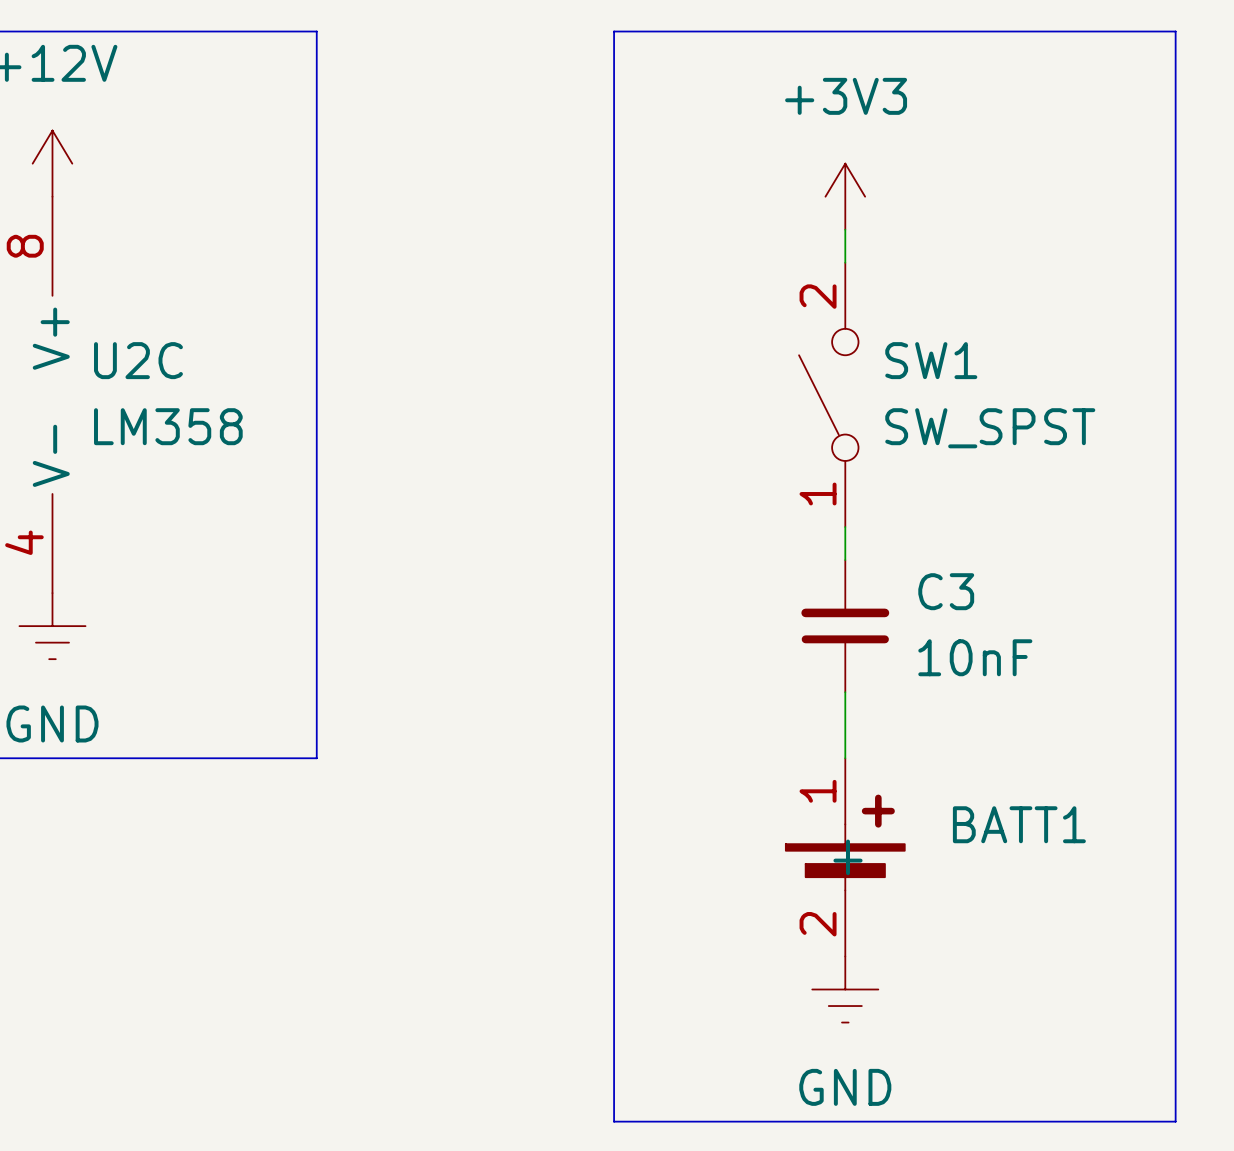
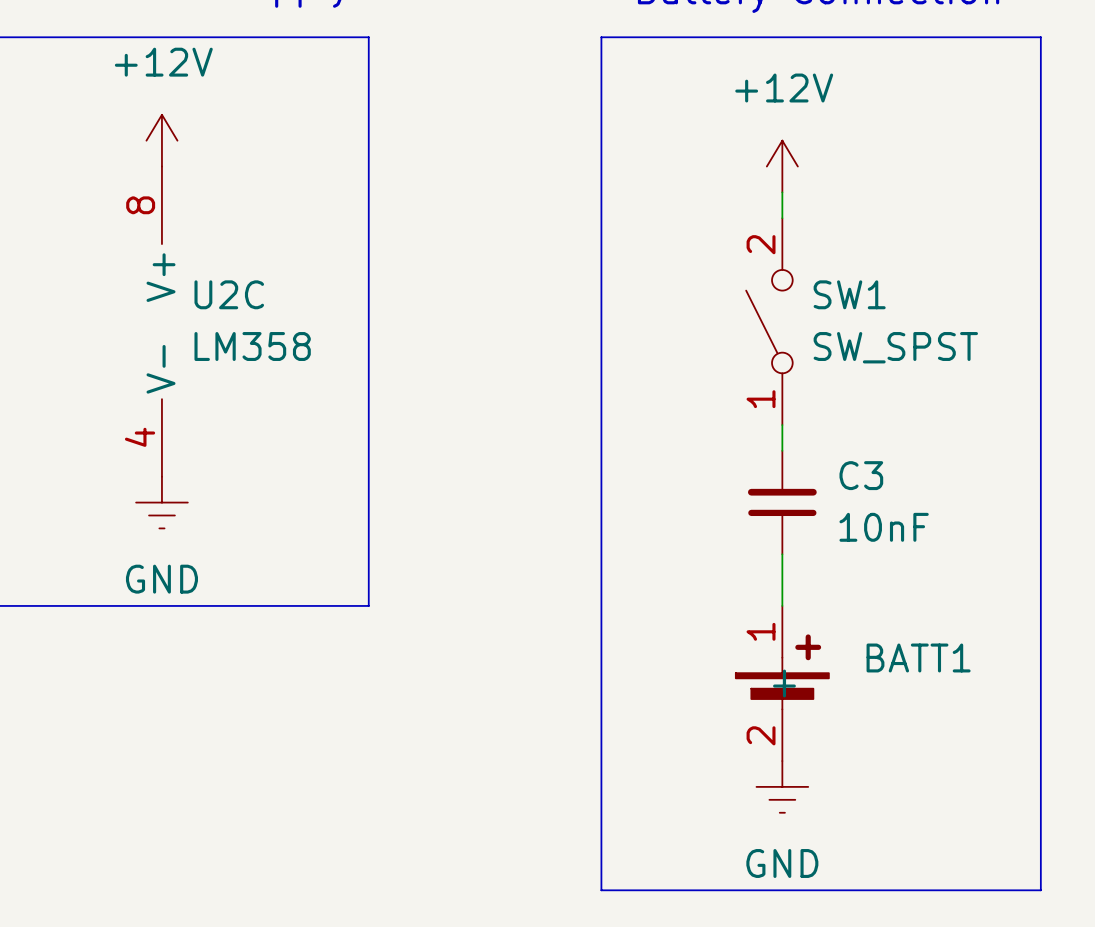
power symbol: +3V3 (845, 196) -> +12V (782, 166)

